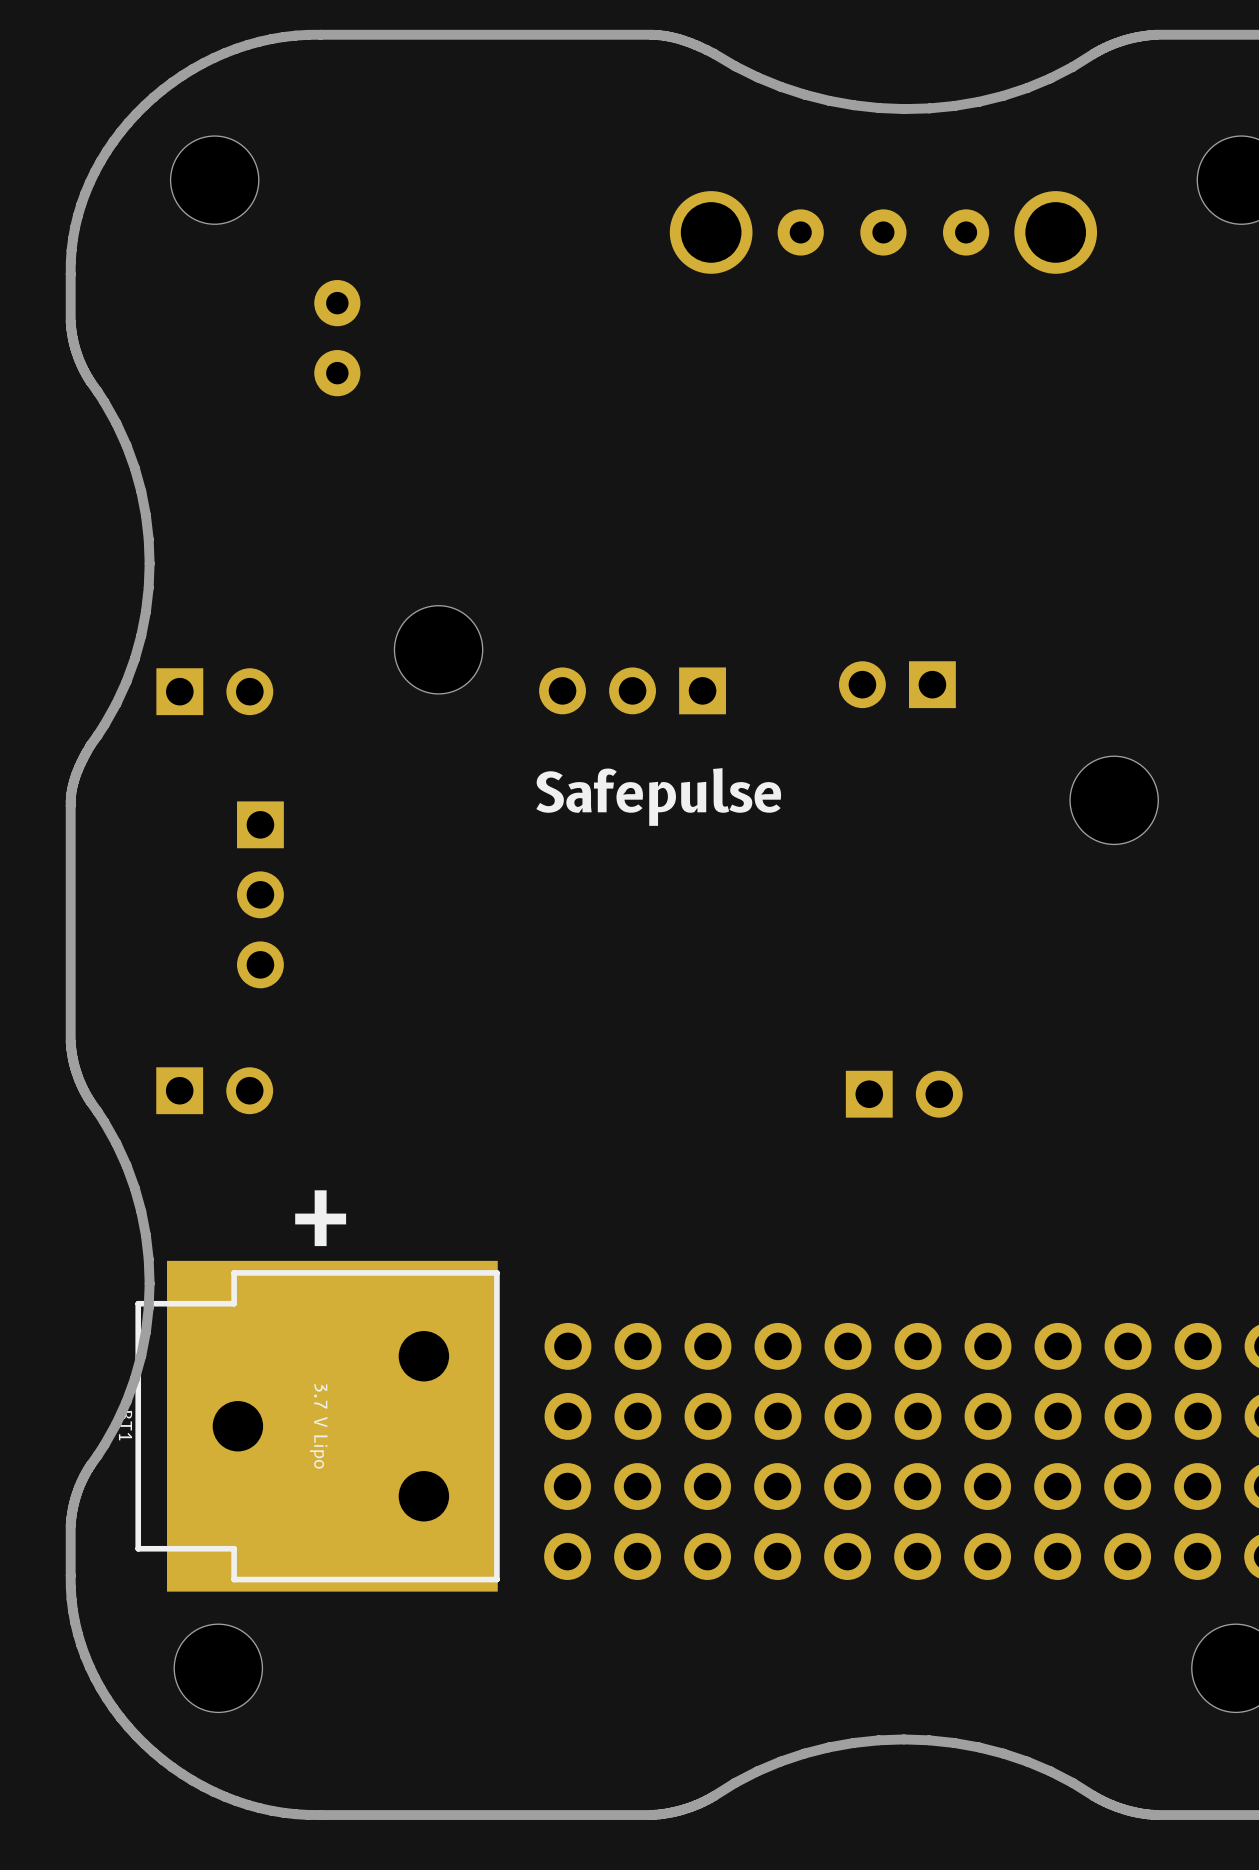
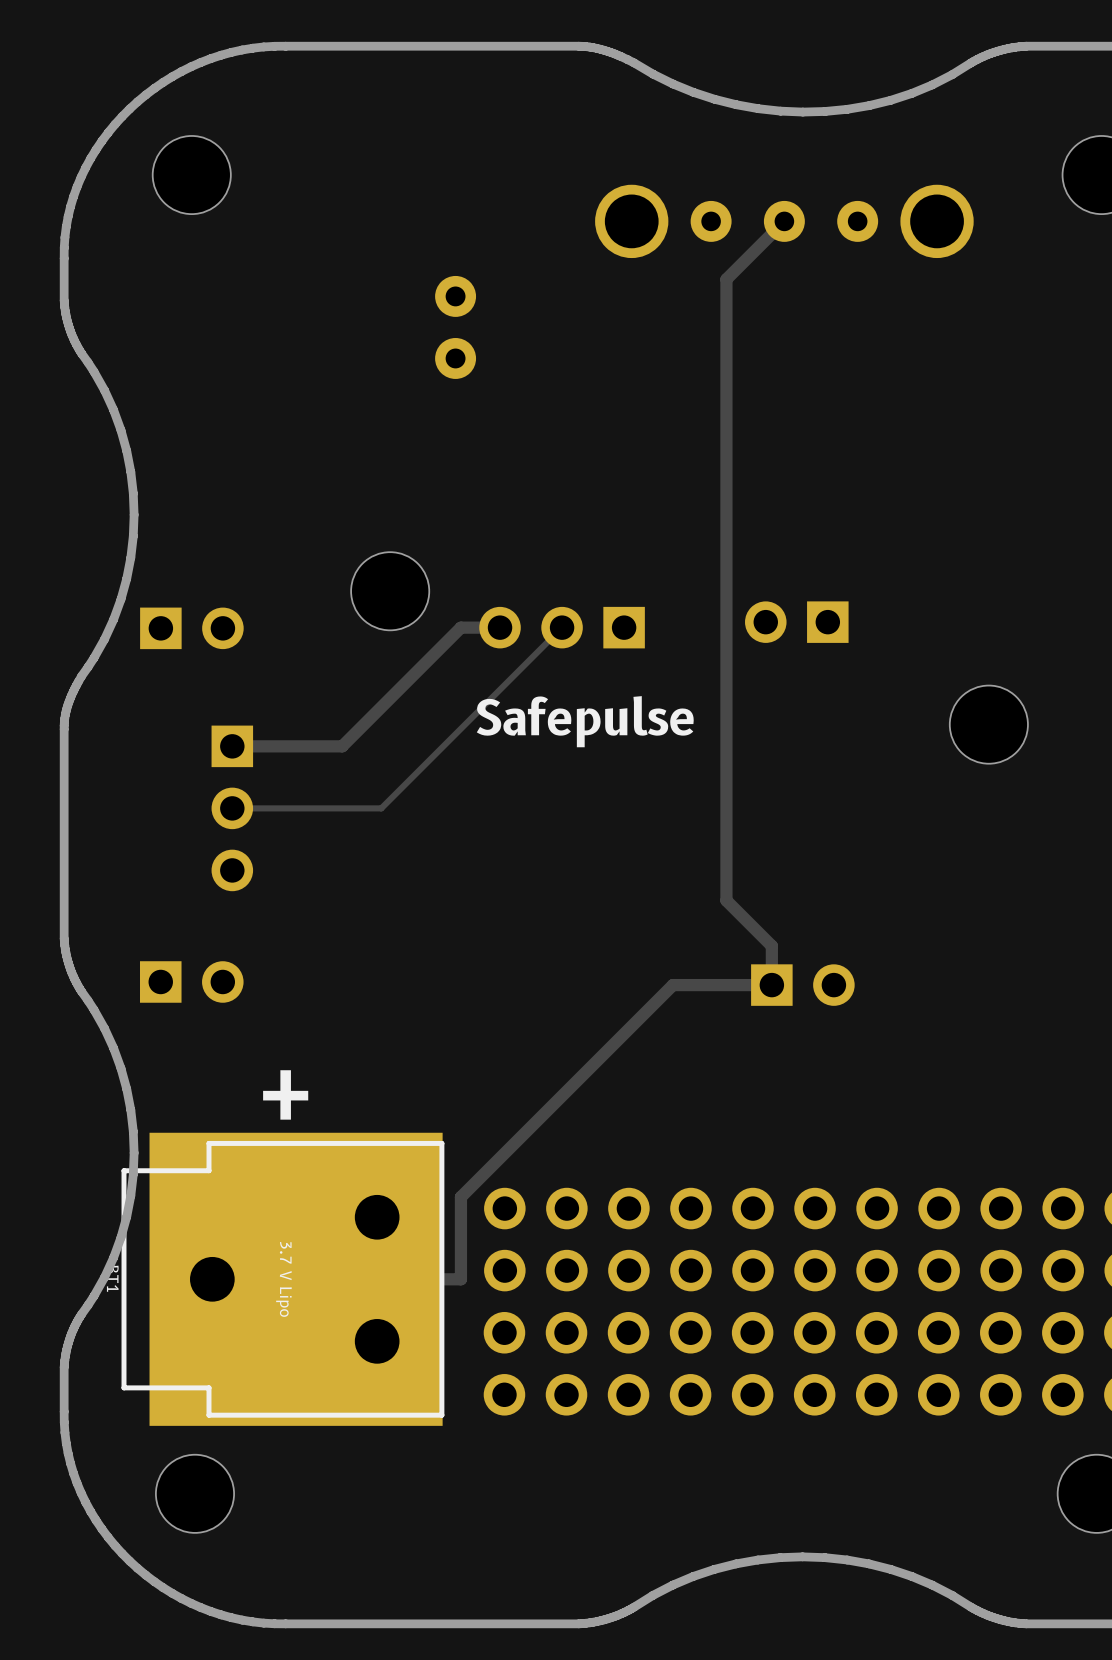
track: none -> (784, 221) (726, 279) (726, 900) (771, 946) (771, 985) (672, 985) (460, 1197) (460, 1279) (212, 1279)
part position: (337, 338) -> (455, 327)
track: none -> (500, 627) (460, 627) (342, 746) (232, 746)
track: none -> (562, 627) (381, 808) (232, 808)

